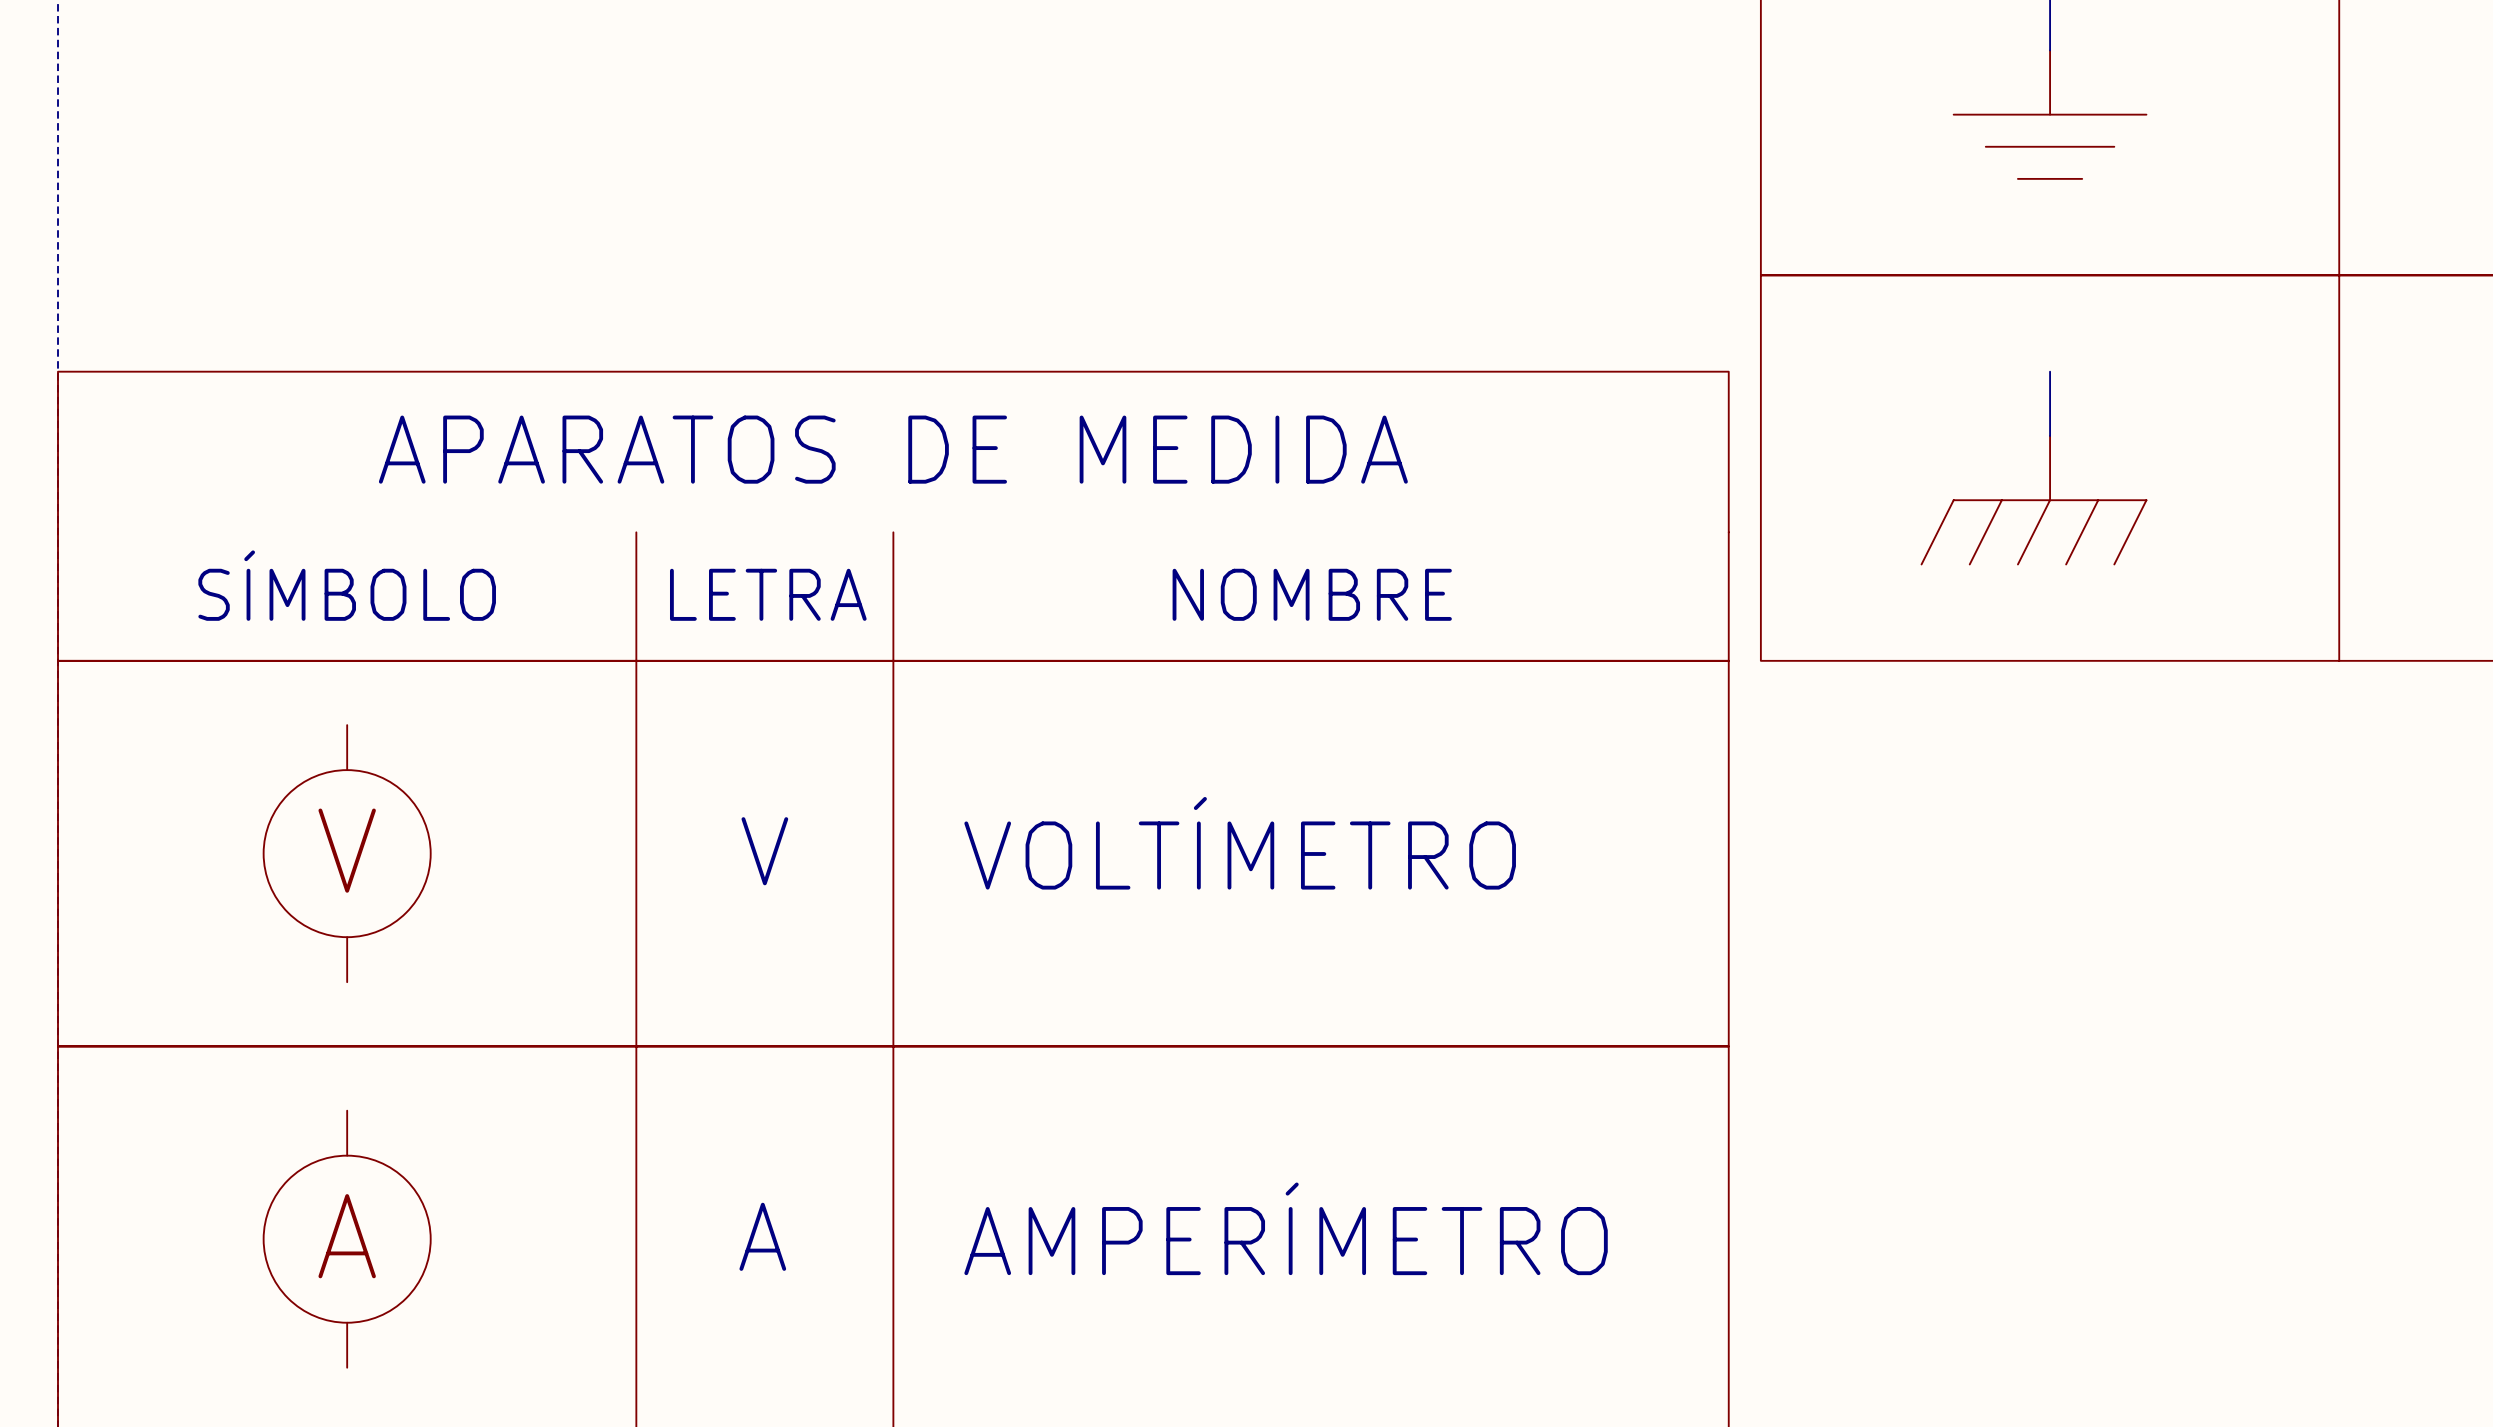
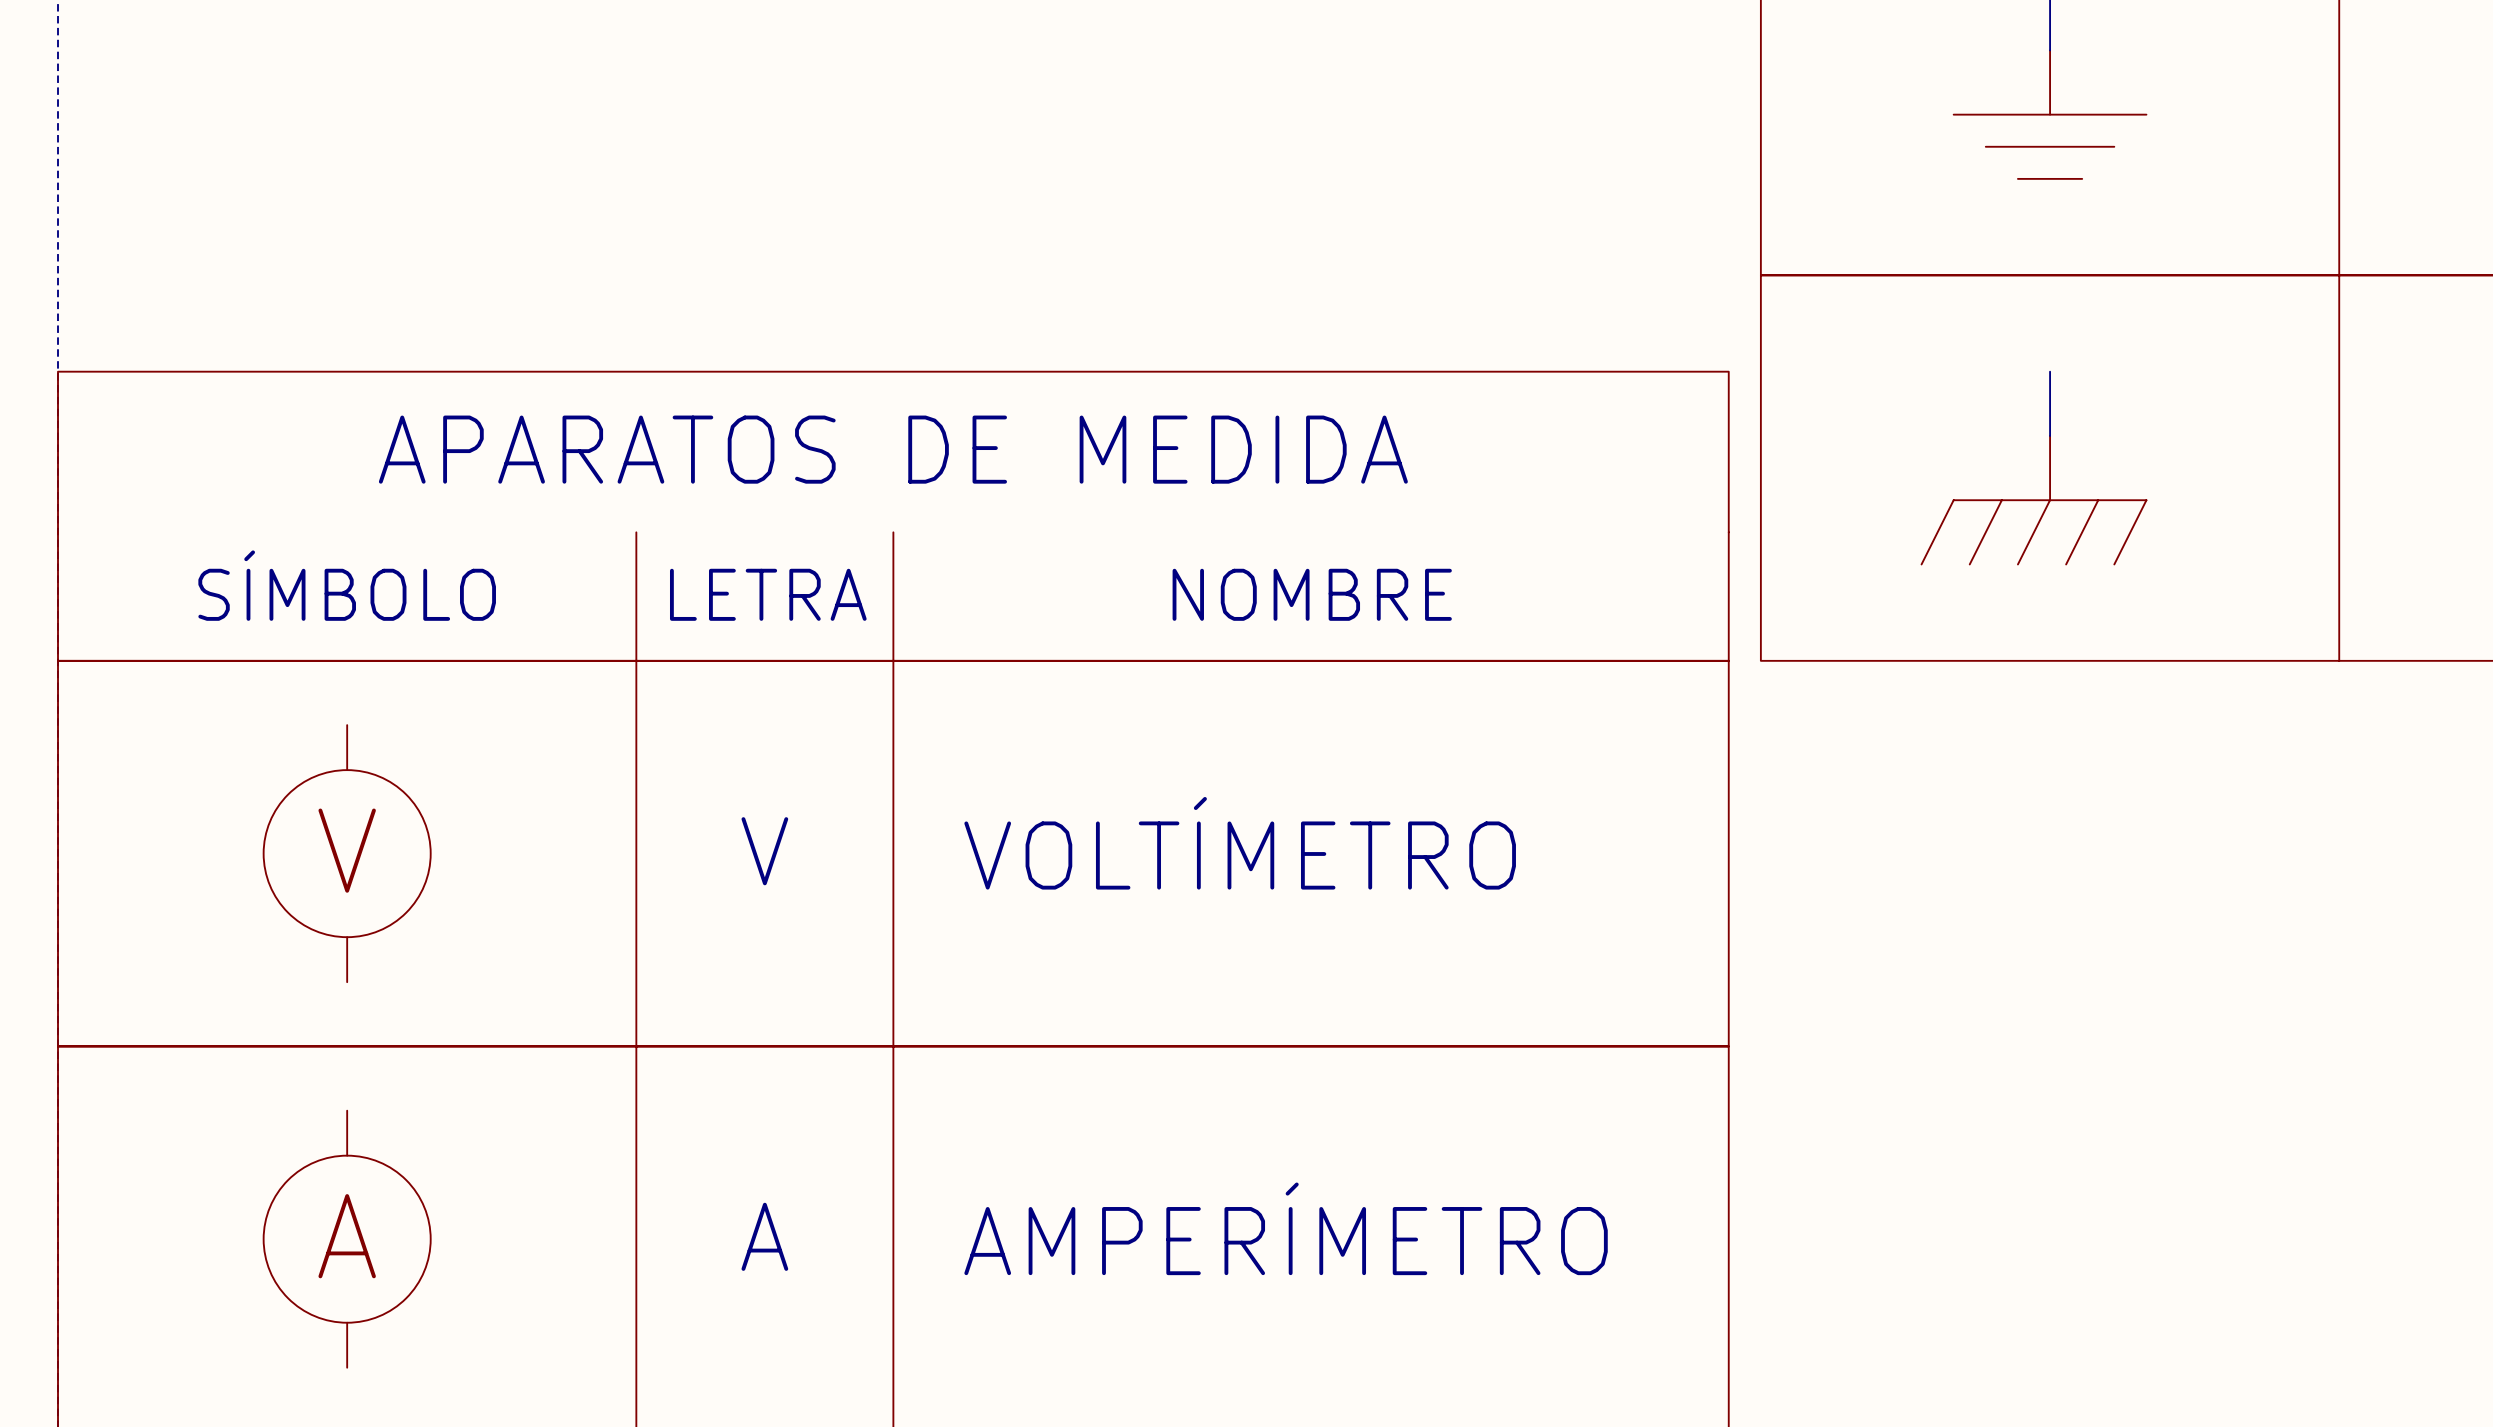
A name position: A (762, 1236) -> A (764, 1236)

